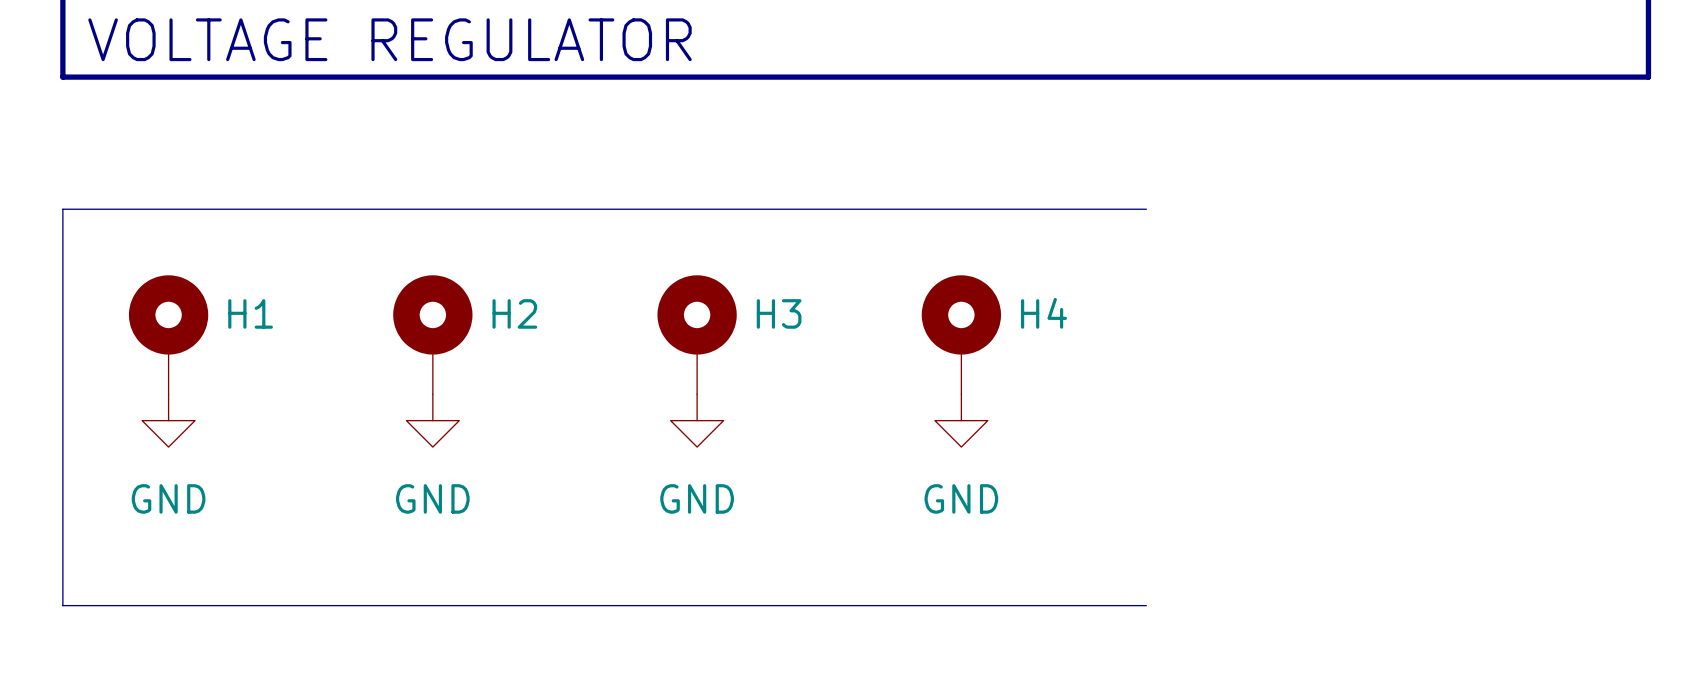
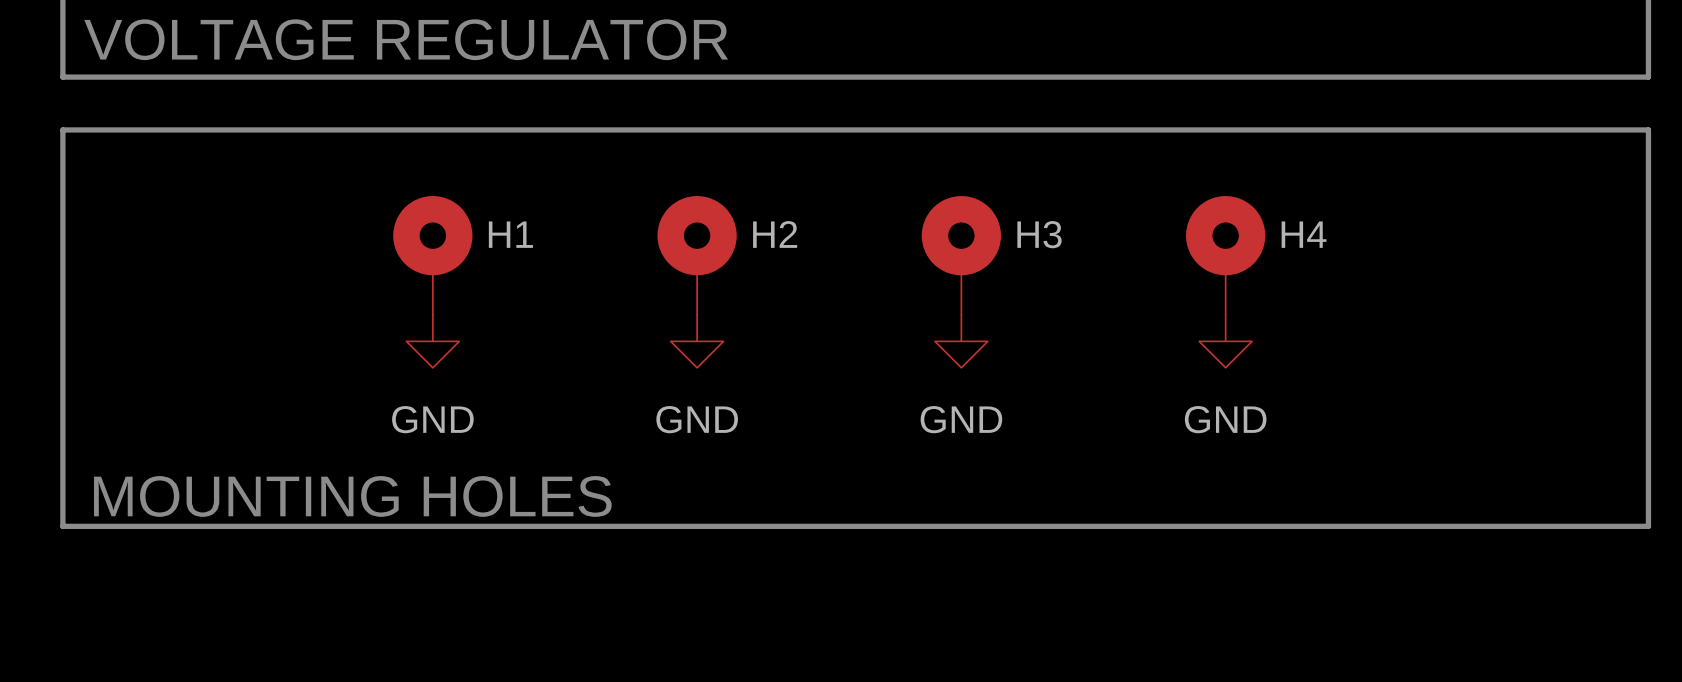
line: (62, 209) (1146, 209) -> (62, 209) (62, 129) (1648, 129) (1648, 526) (62, 526)
line width: thin (62, 209) (62, 526) -> thick (62, 209) (62, 526)
H1 position: (168, 334) -> (432, 255)
H2 position: (432, 334) -> (697, 255)
H3 position: (697, 334) -> (961, 255)
H4 position: (961, 334) -> (1225, 255)
power symbol: none -> GND (1225, 341)
power symbol: GND (168, 420) -> none
power symbol position: GND (432, 420) -> GND (432, 341)
power symbol position: GND (697, 420) -> GND (697, 341)
power symbol position: GND (961, 420) -> GND (961, 341)
text: none -> MOUNTING HOLES (352, 496)
line: (62, 526) (62, 605) (1146, 605) -> none

